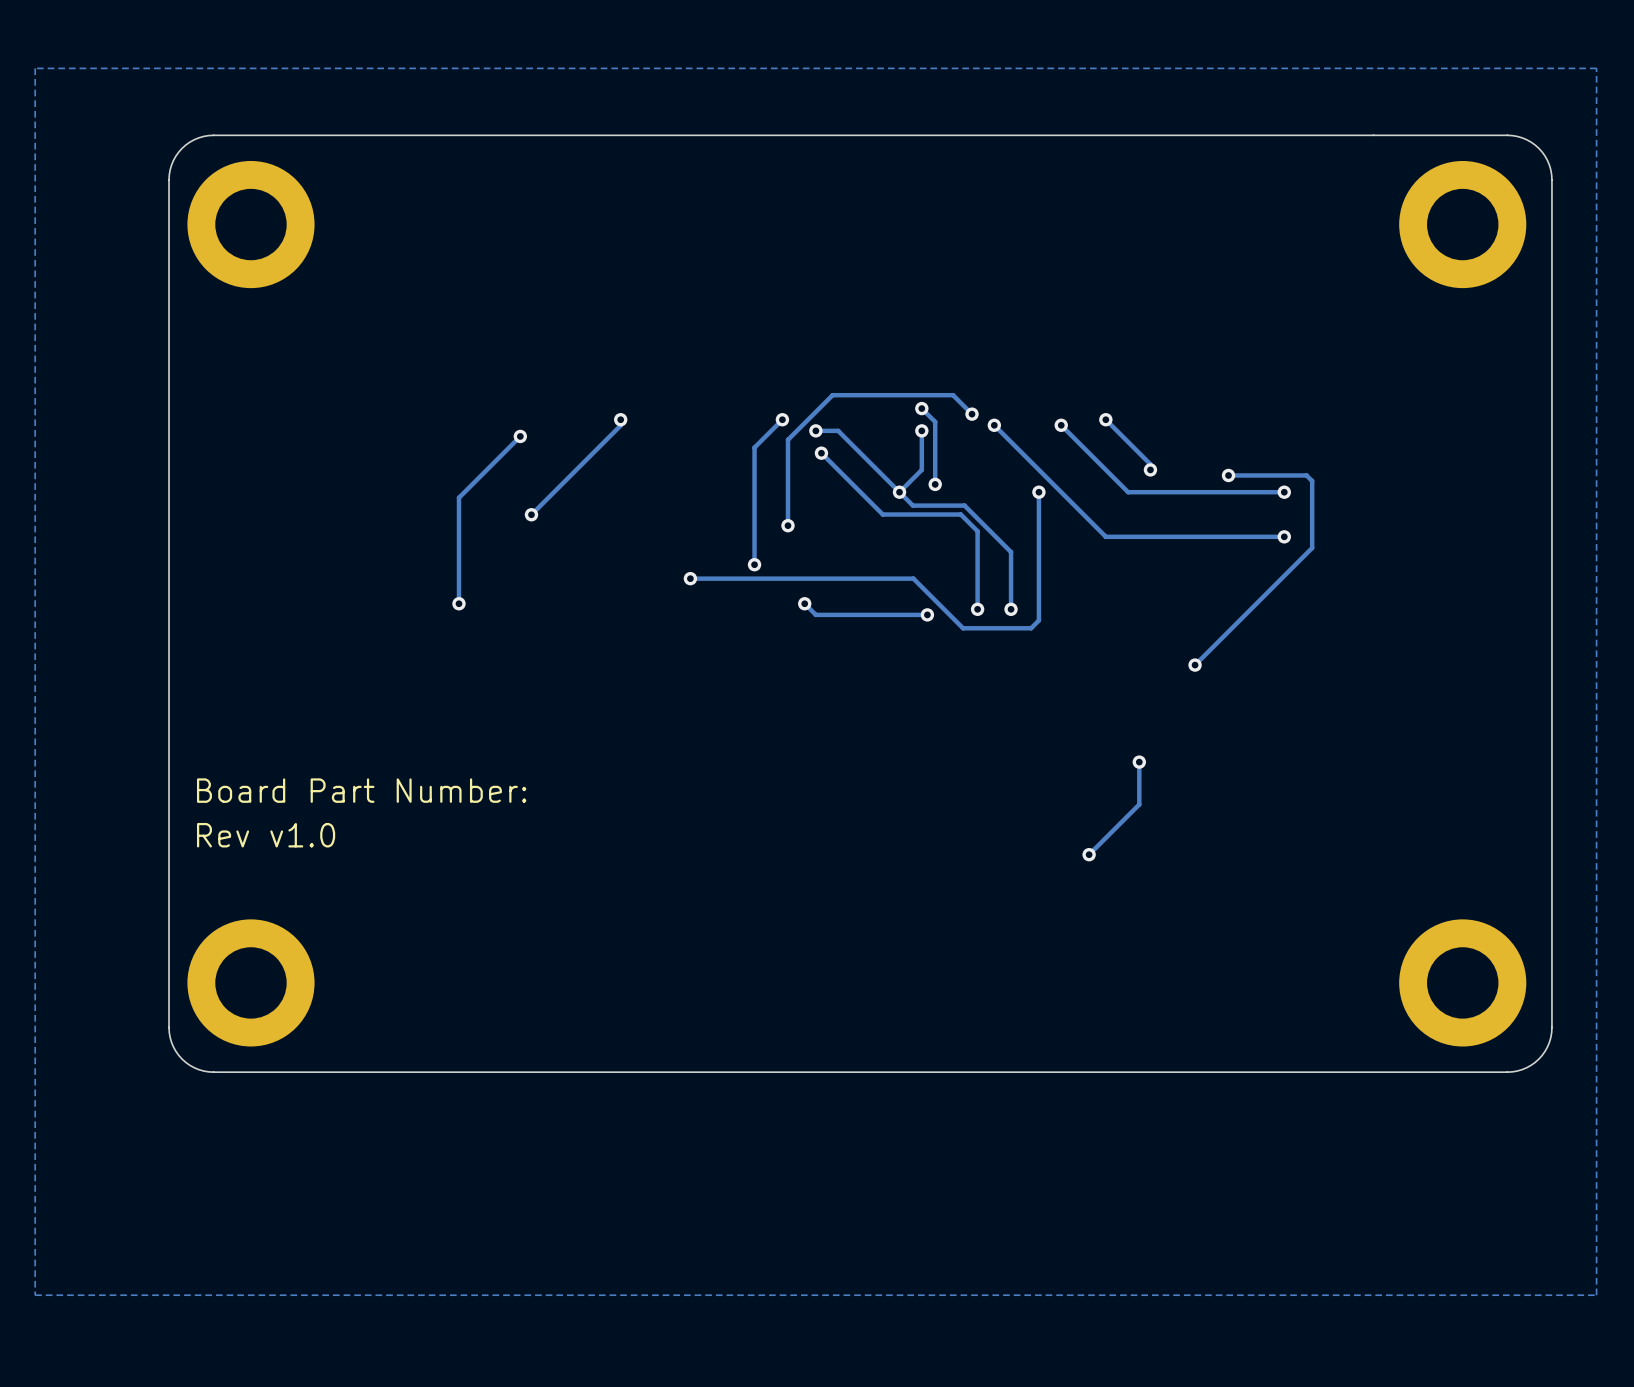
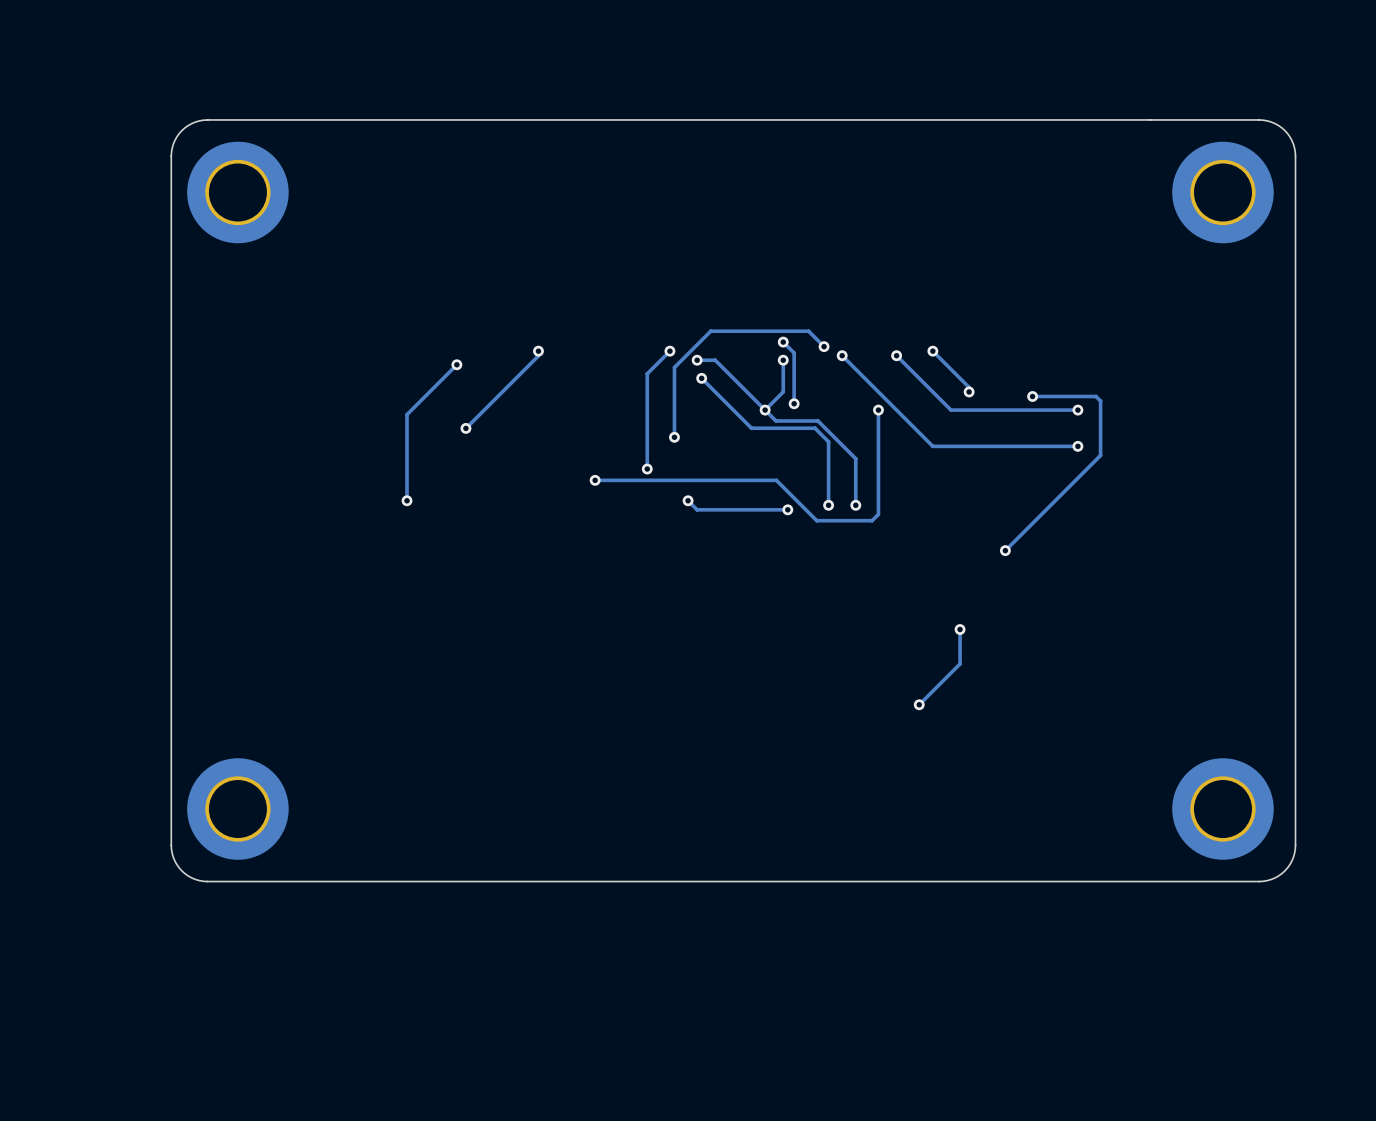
zone outline: (1596, 68) (35, 68) (35, 1295) (1596, 1295) (1596, 68) -> none
part footprint: [187, 160, 315, 289] -> [187, 141, 289, 244]
part footprint: [1399, 160, 1527, 289] -> [1172, 141, 1274, 244]
text: Board Part Number: (361, 790) -> none
text: Rev v1.0 (266, 835) -> none
part footprint: [187, 919, 315, 1047] -> [187, 758, 289, 860]
part footprint: [1399, 919, 1527, 1047] -> [1172, 758, 1274, 860]

